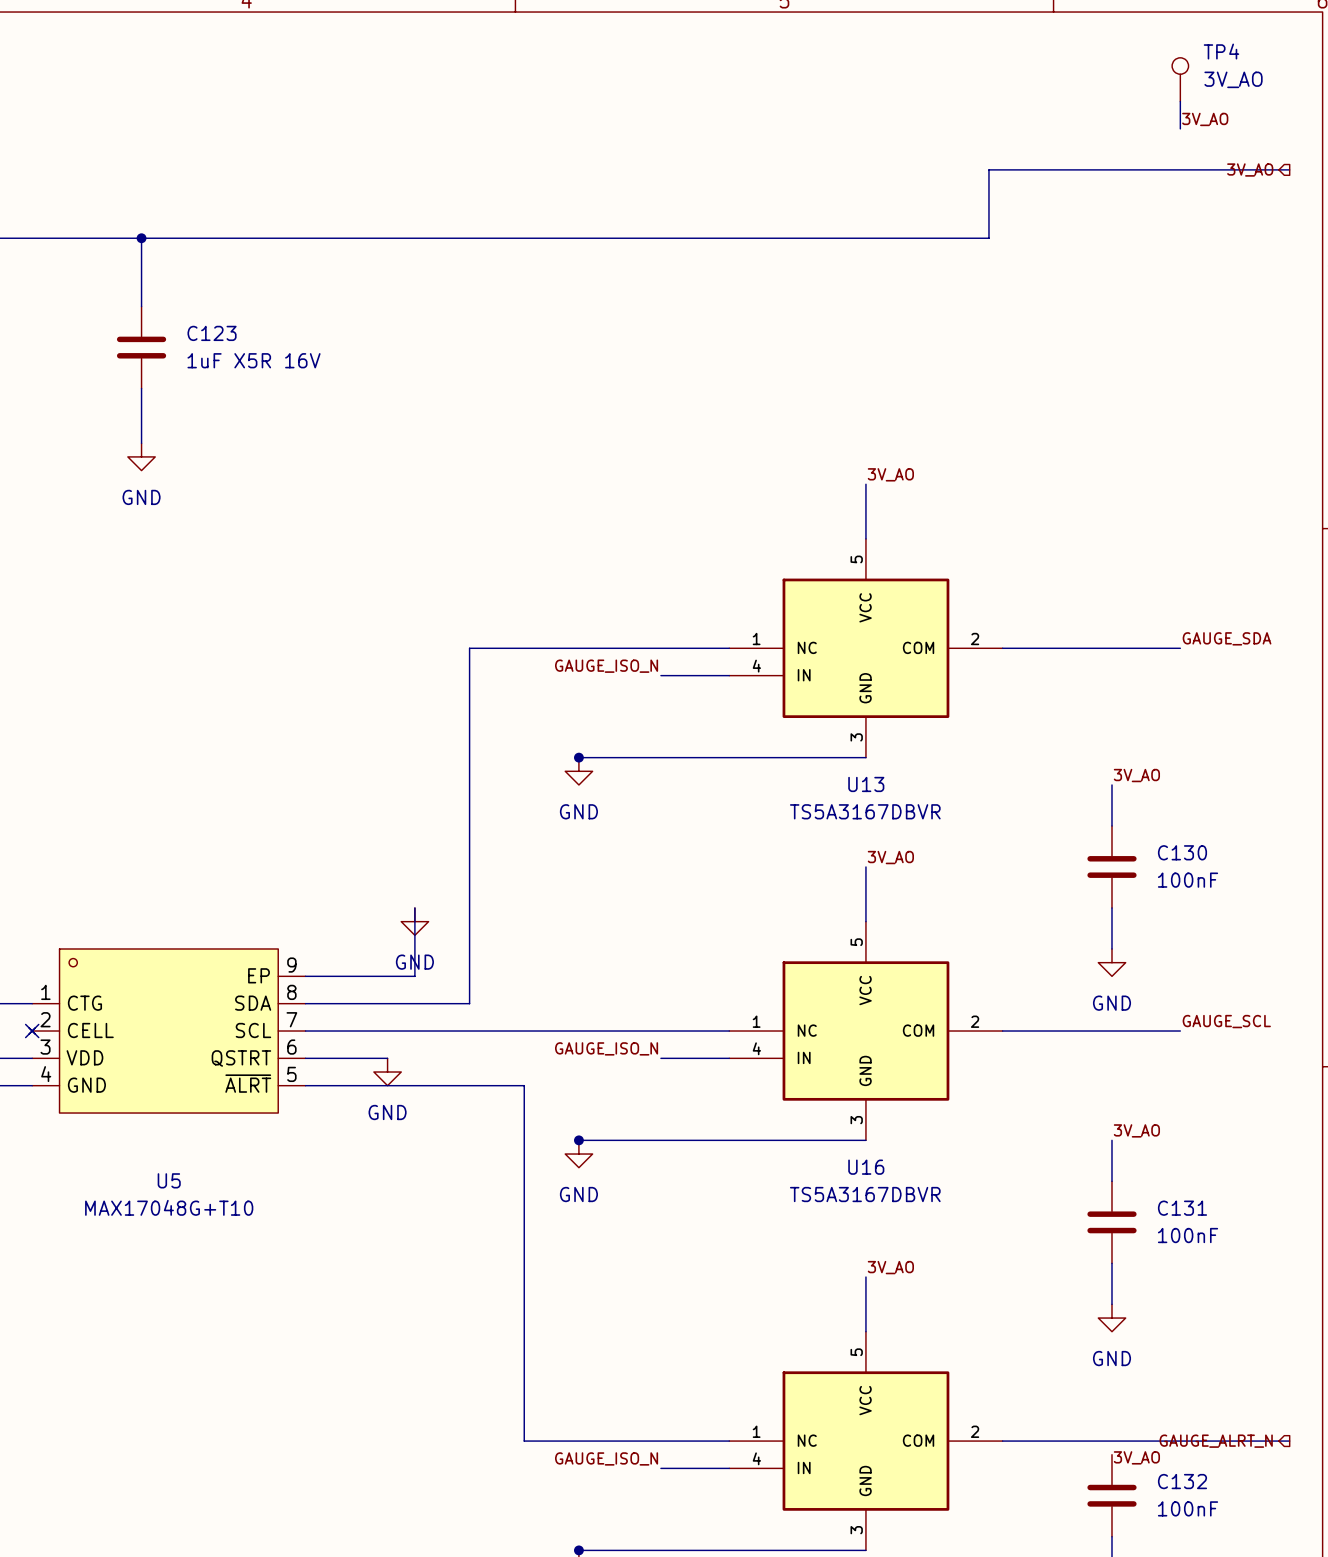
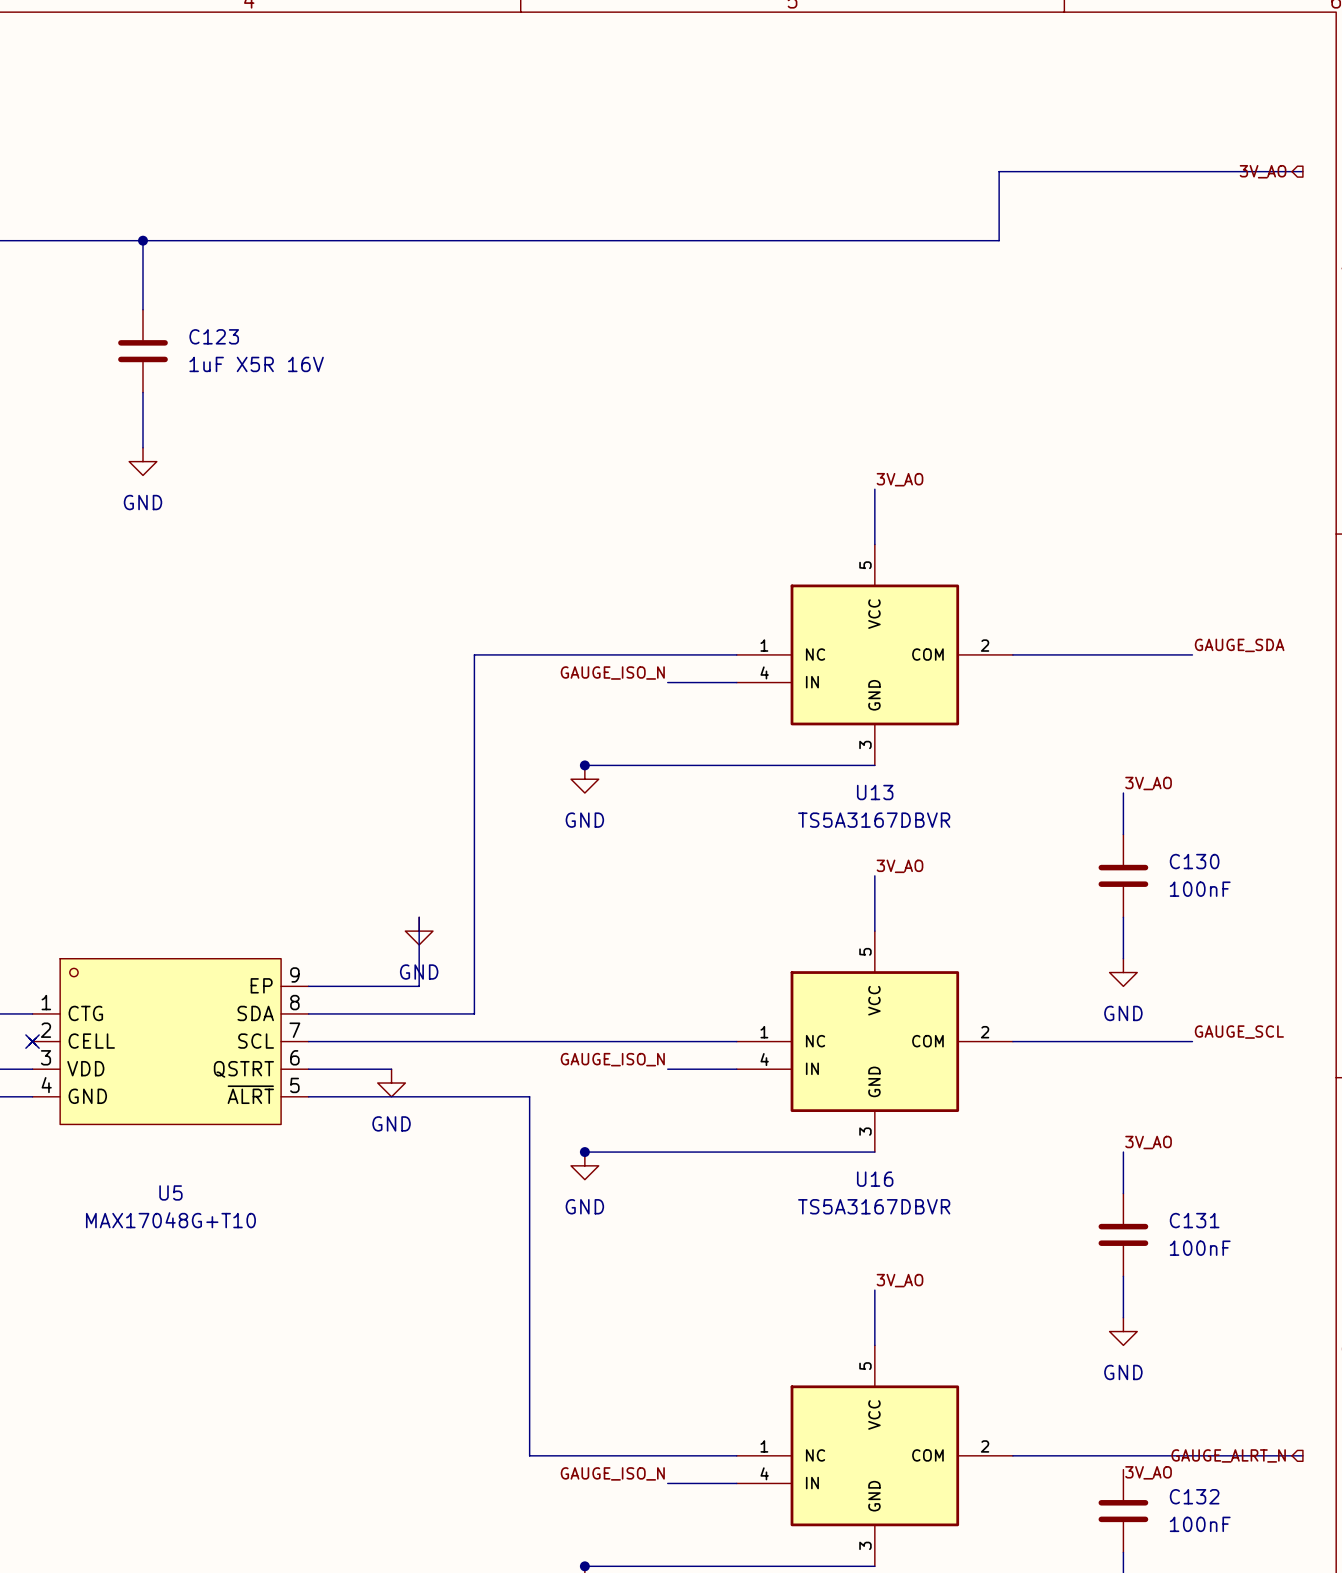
TP4: 3V_AO (1180, 79) -> none
wire: (1180, 101) (1180, 128) -> none
label: 3V_AO (1205, 119) -> none

